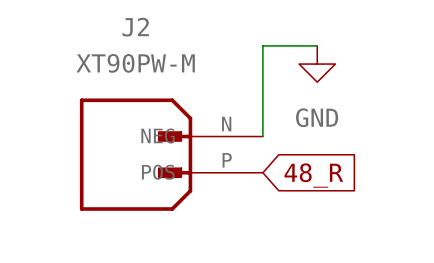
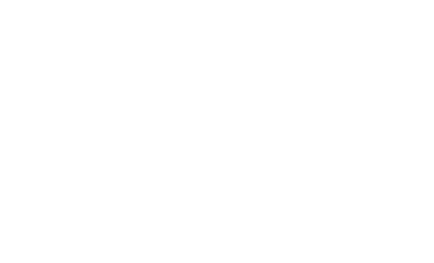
wire: (317, 45) (262, 45) (262, 136) -> none
power symbol: GND (317, 64) -> none
J2: XT90PW-M (171, 154) -> none
global label: 48_R (313, 175) -> none

